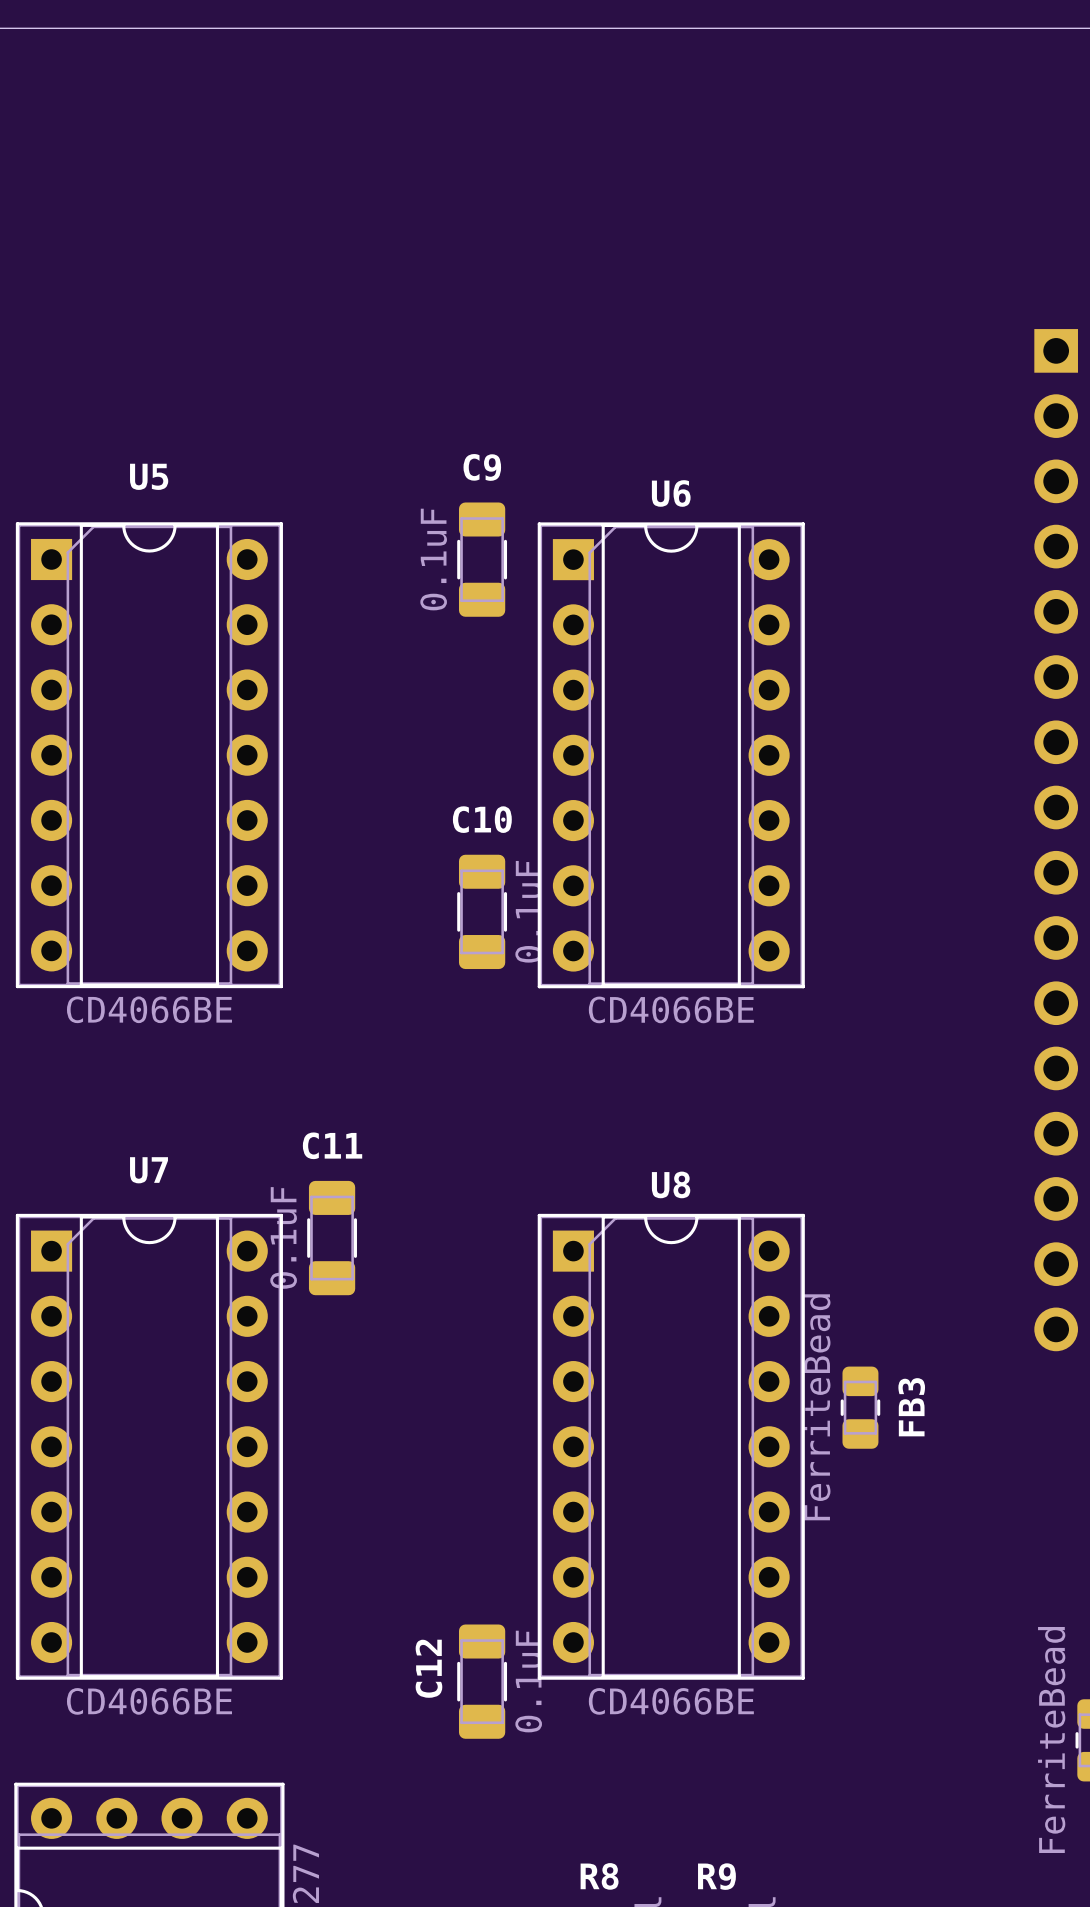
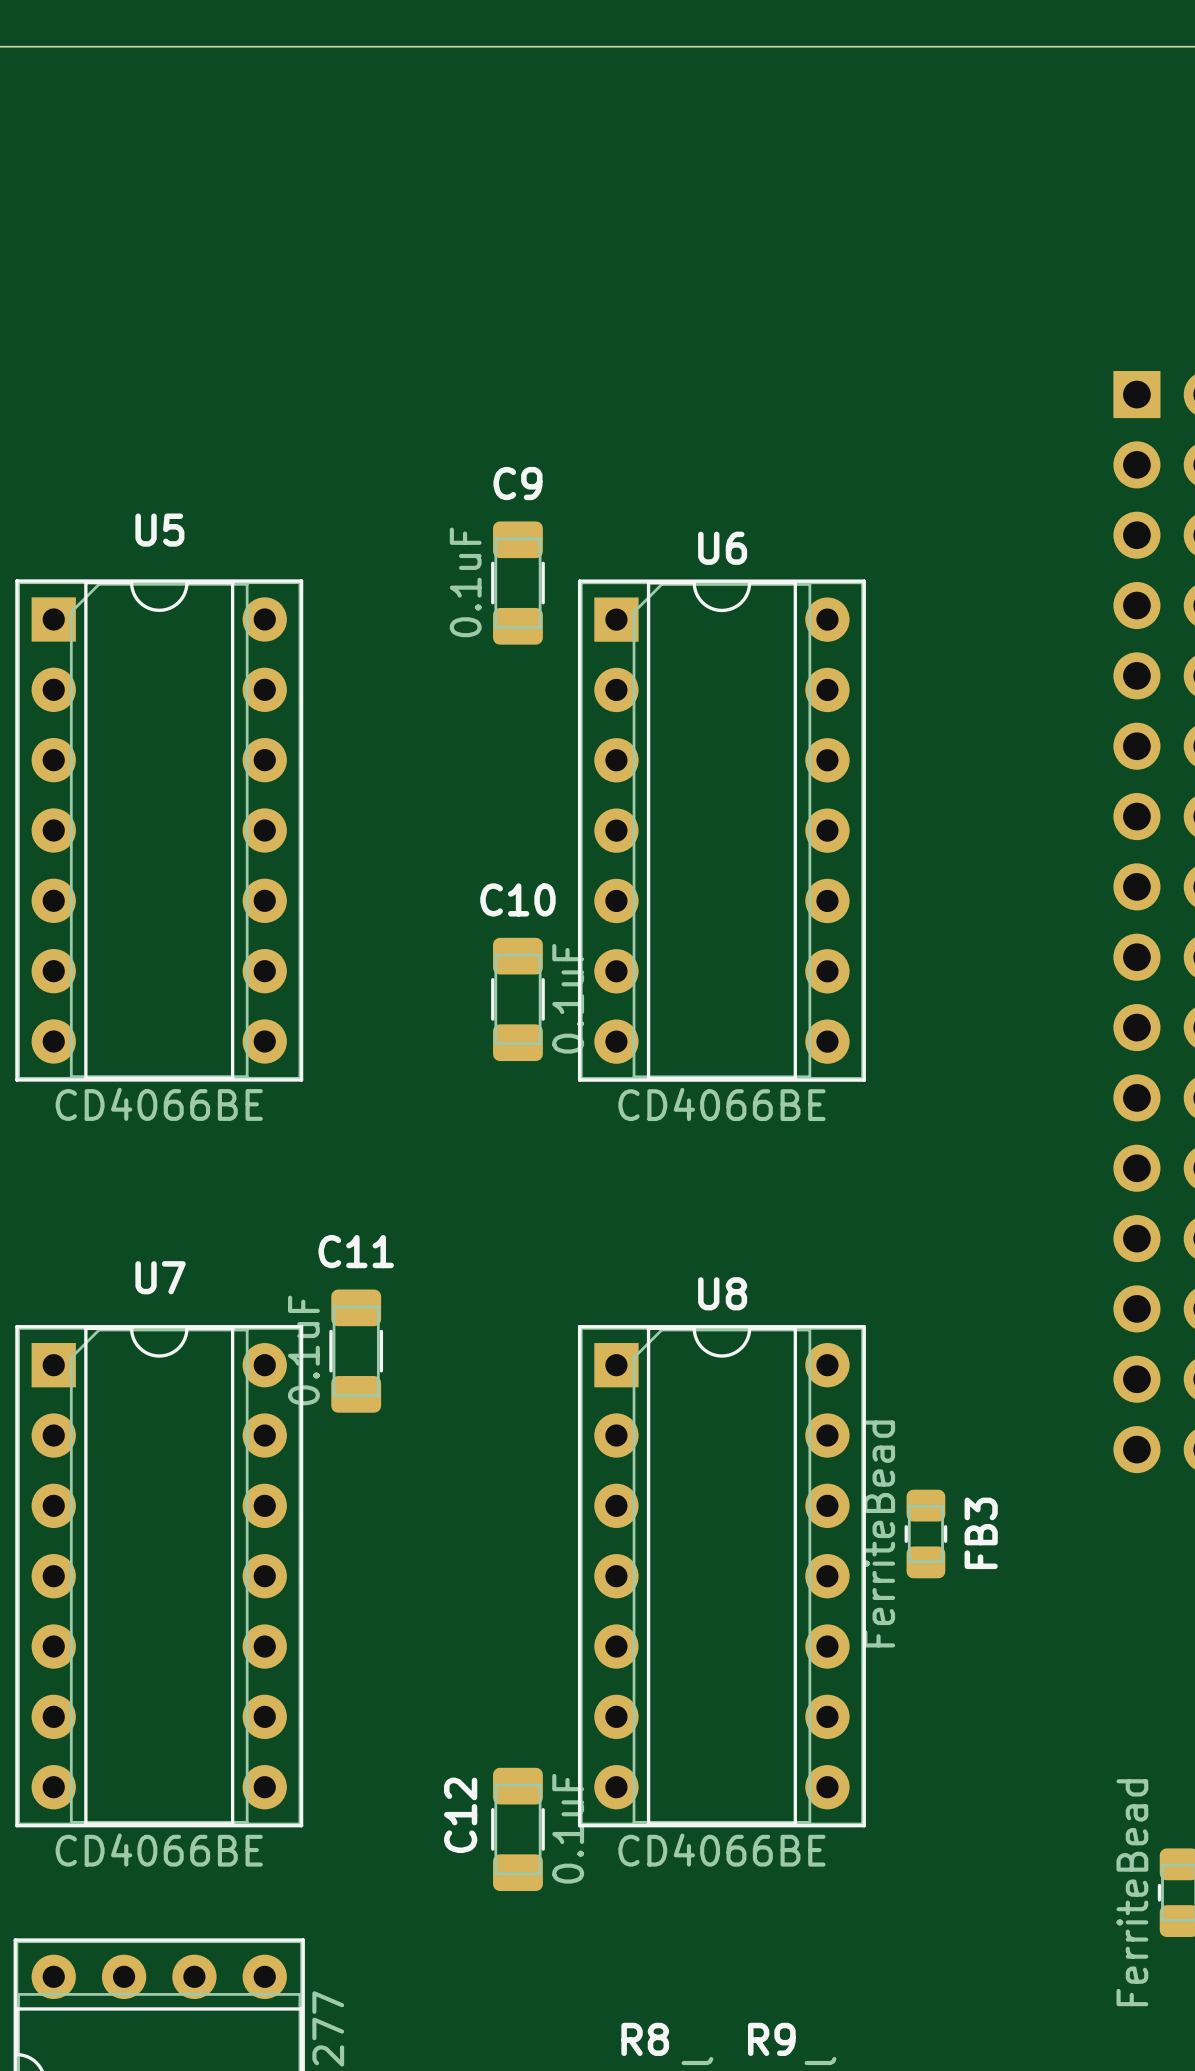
C9 position: (482, 559) -> (517, 583)

